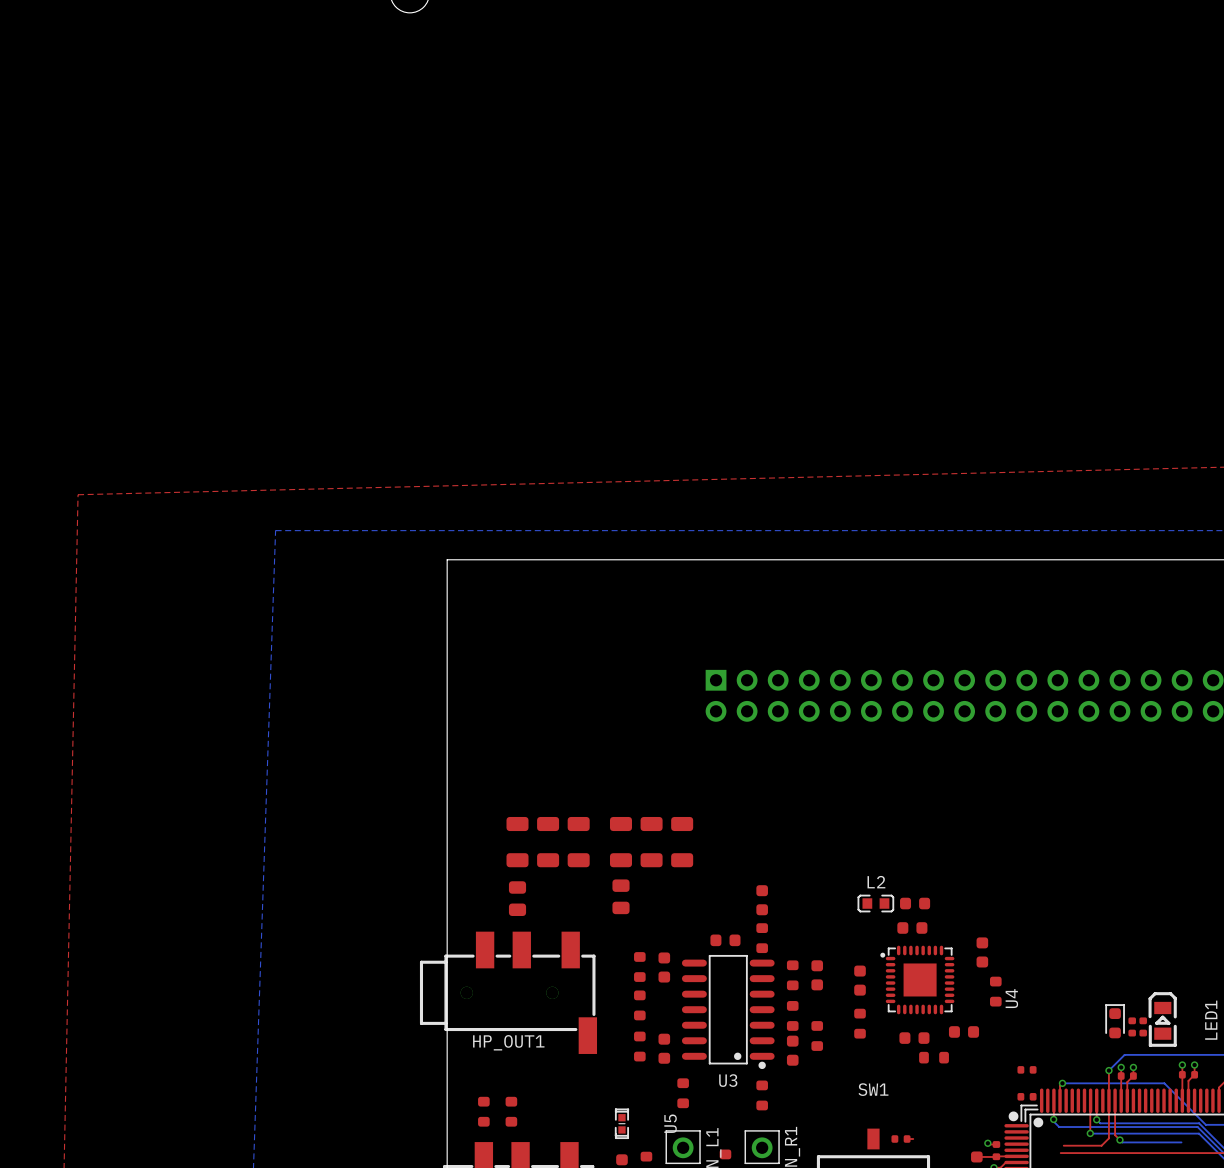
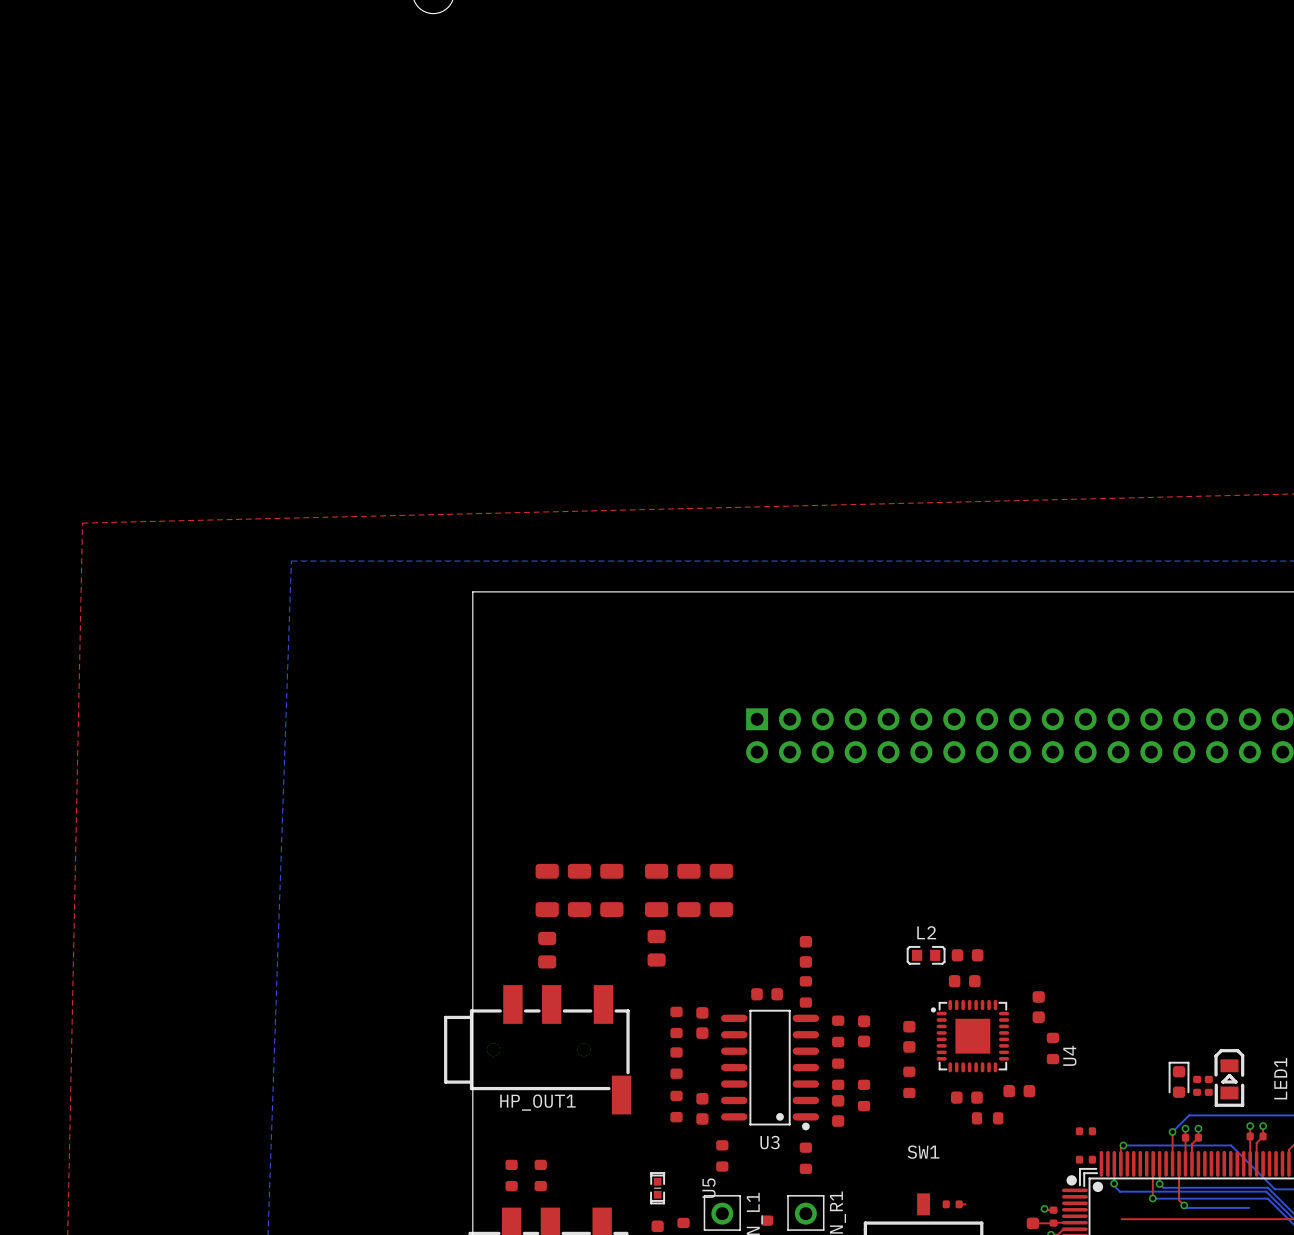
top track: (1108, 1100) (1108, 1138) (1101, 1145) (1063, 1145) -> none

